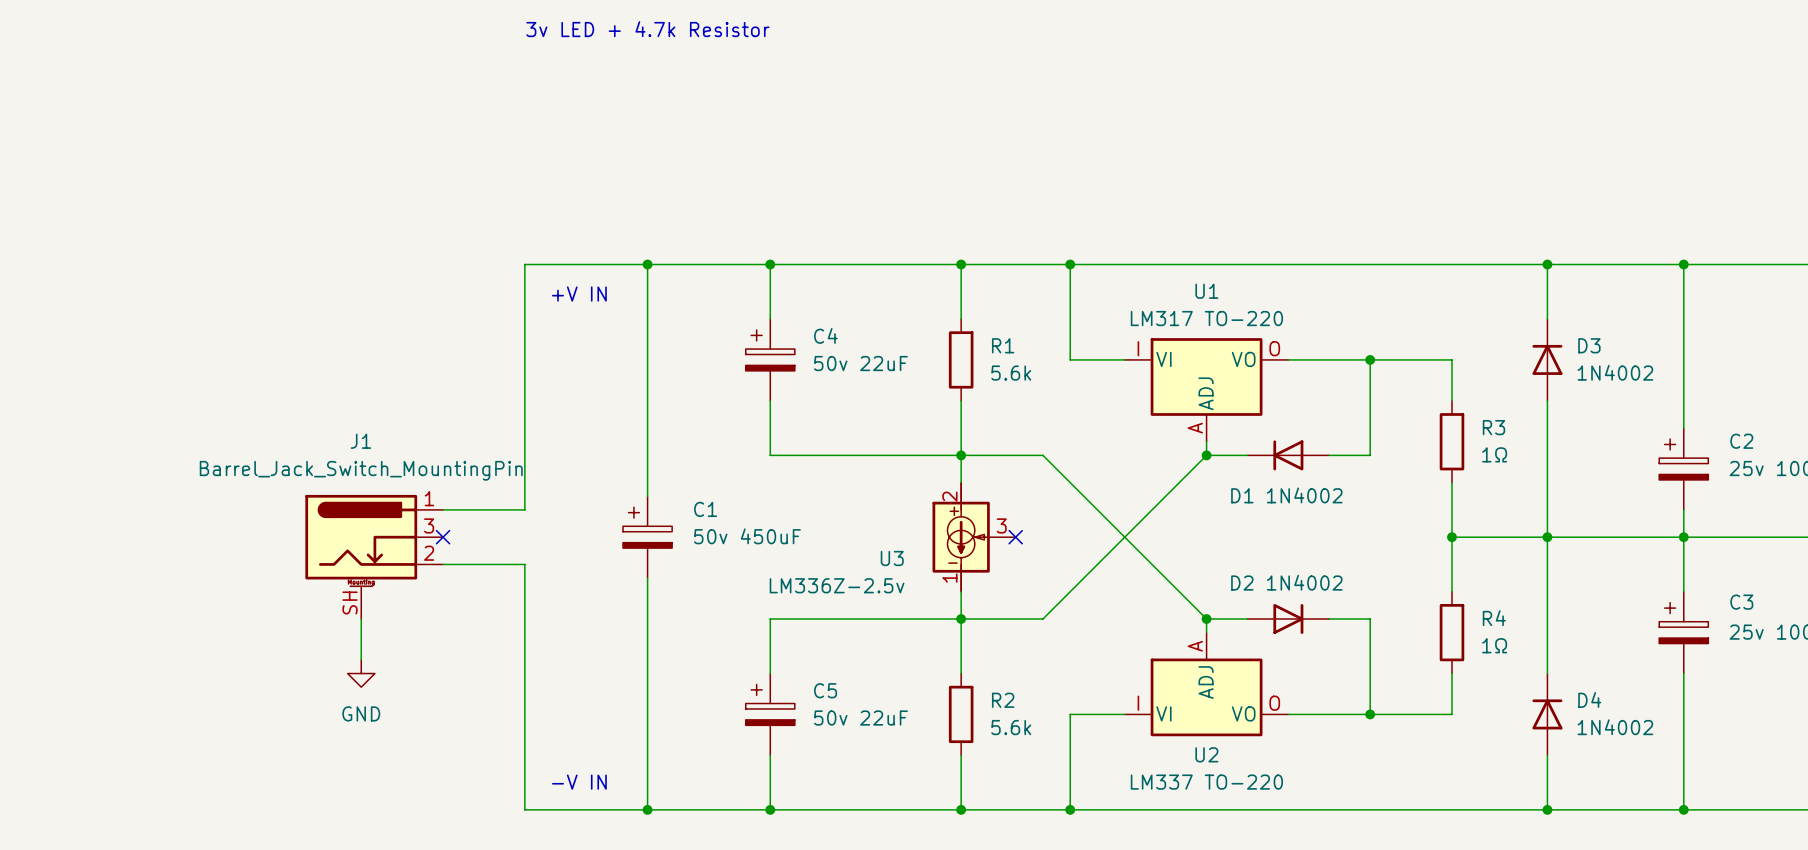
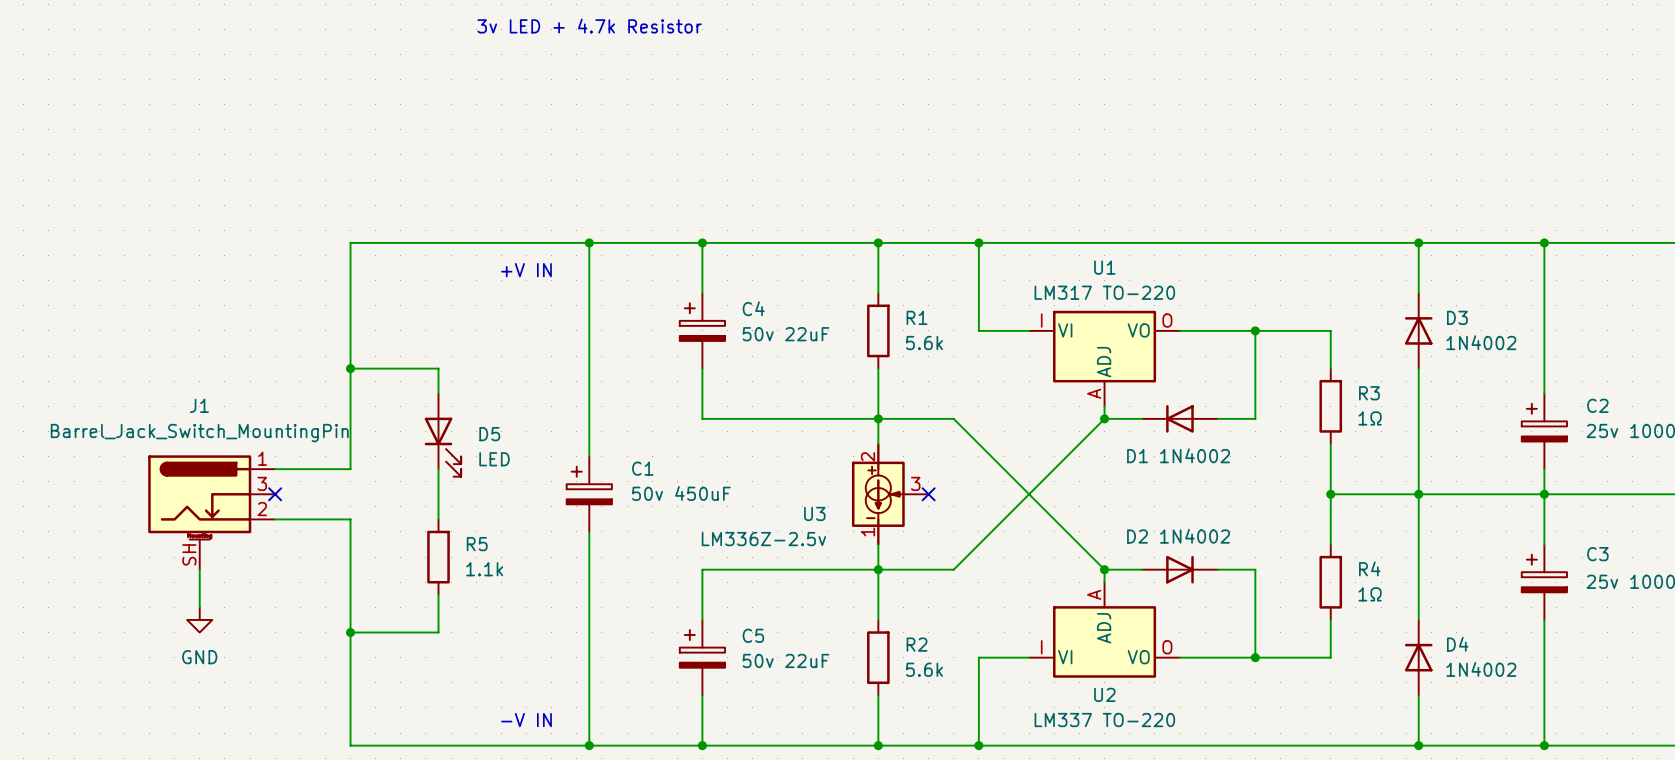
wire: (524, 264) (524, 509) (443, 509) -> (476, 242) (350, 242) (350, 469) (275, 469)
wire: none -> (350, 368) (438, 368) (438, 393)
junction: none -> (350, 368)
D5: none -> LED (442, 435)
wire: none -> (438, 469) (438, 519)
no-connect mark: none -> (275, 494)
no-connect mark: (443, 537) -> none
J1 position: (374, 556) -> (211, 512)
wire: (443, 564) (524, 564) (524, 809) -> (275, 519) (350, 519) (350, 745) (476, 745)
R5: none -> 1.1k (438, 557)
wire: (361, 618) (361, 659) -> (199, 569) (199, 607)
wire: none -> (438, 594) (438, 632) (350, 632)
power symbol position: GND (361, 673) -> GND (199, 619)
junction: none -> (350, 632)

